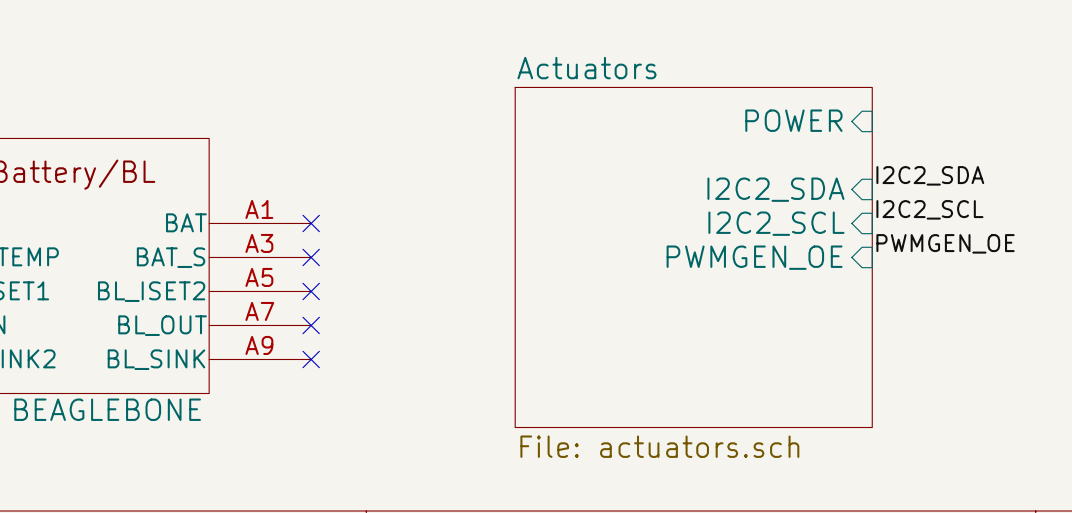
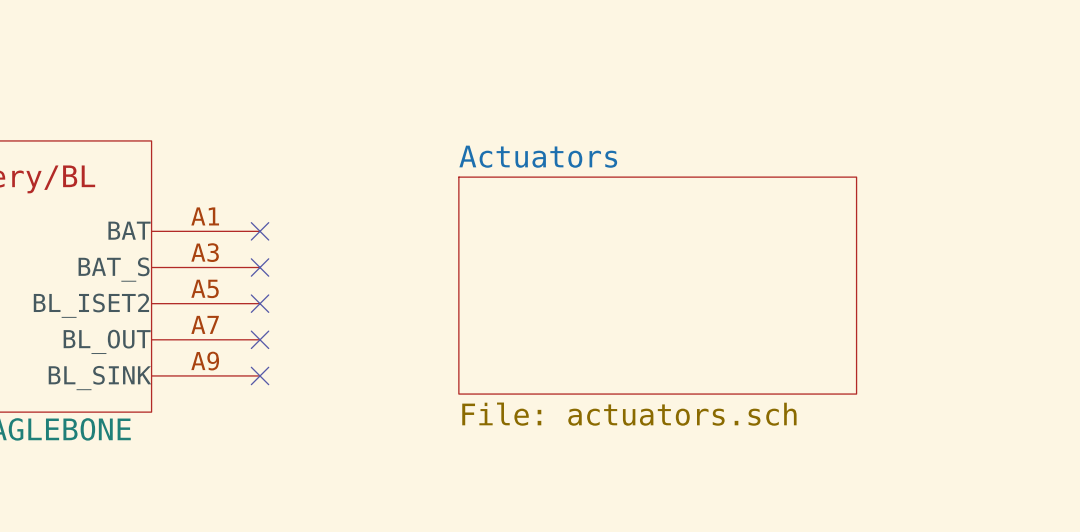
sheet pin: POWER (793, 120) -> none
label: I2C2_SDA (930, 175) -> none
sheet pin: I2C2_SDA (775, 189) -> none
label: I2C2_SCL (929, 209) -> none
sheet pin: I2C2_SCL (776, 223) -> none
label: PWMGEN_OE (945, 243) -> none
sheet Actuators: File: actuators.sch (693, 257) -> none
sheet pin: PWMGEN_OE (754, 257) -> none
sheet Actuators: none -> File: actuators.sch (657, 285)

